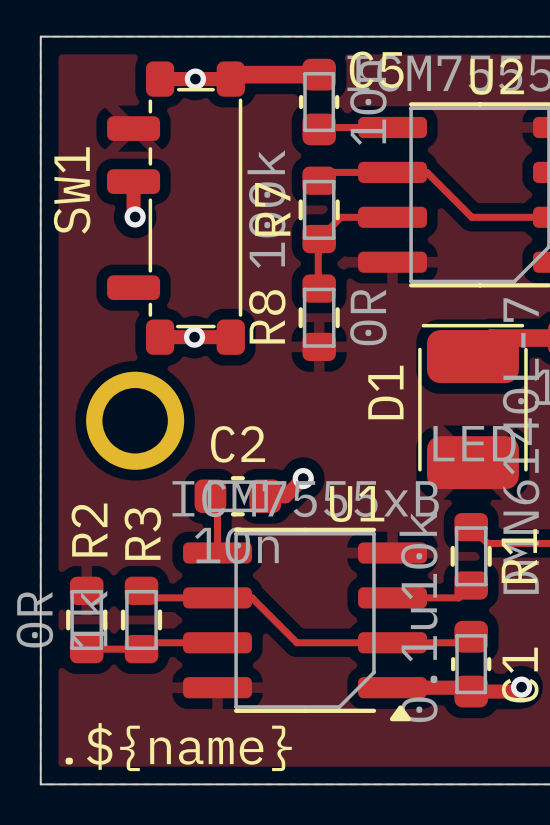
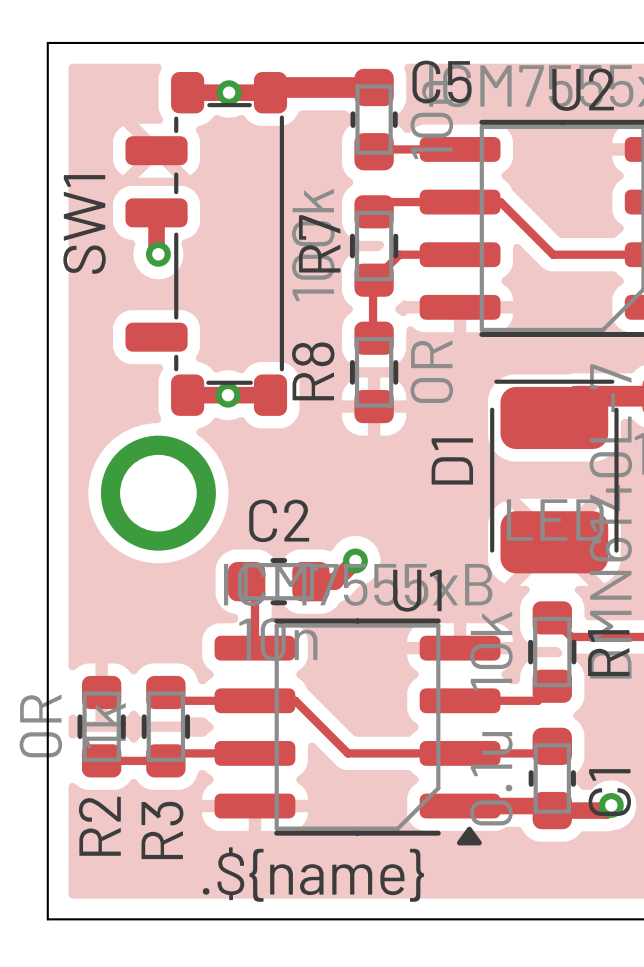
R2 name position: R2 (89, 530) -> R2 (99, 826)
R3 name position: R3 (142, 533) -> R3 (162, 830)
text position: .${name} (178, 747) -> .${name} (313, 874)

